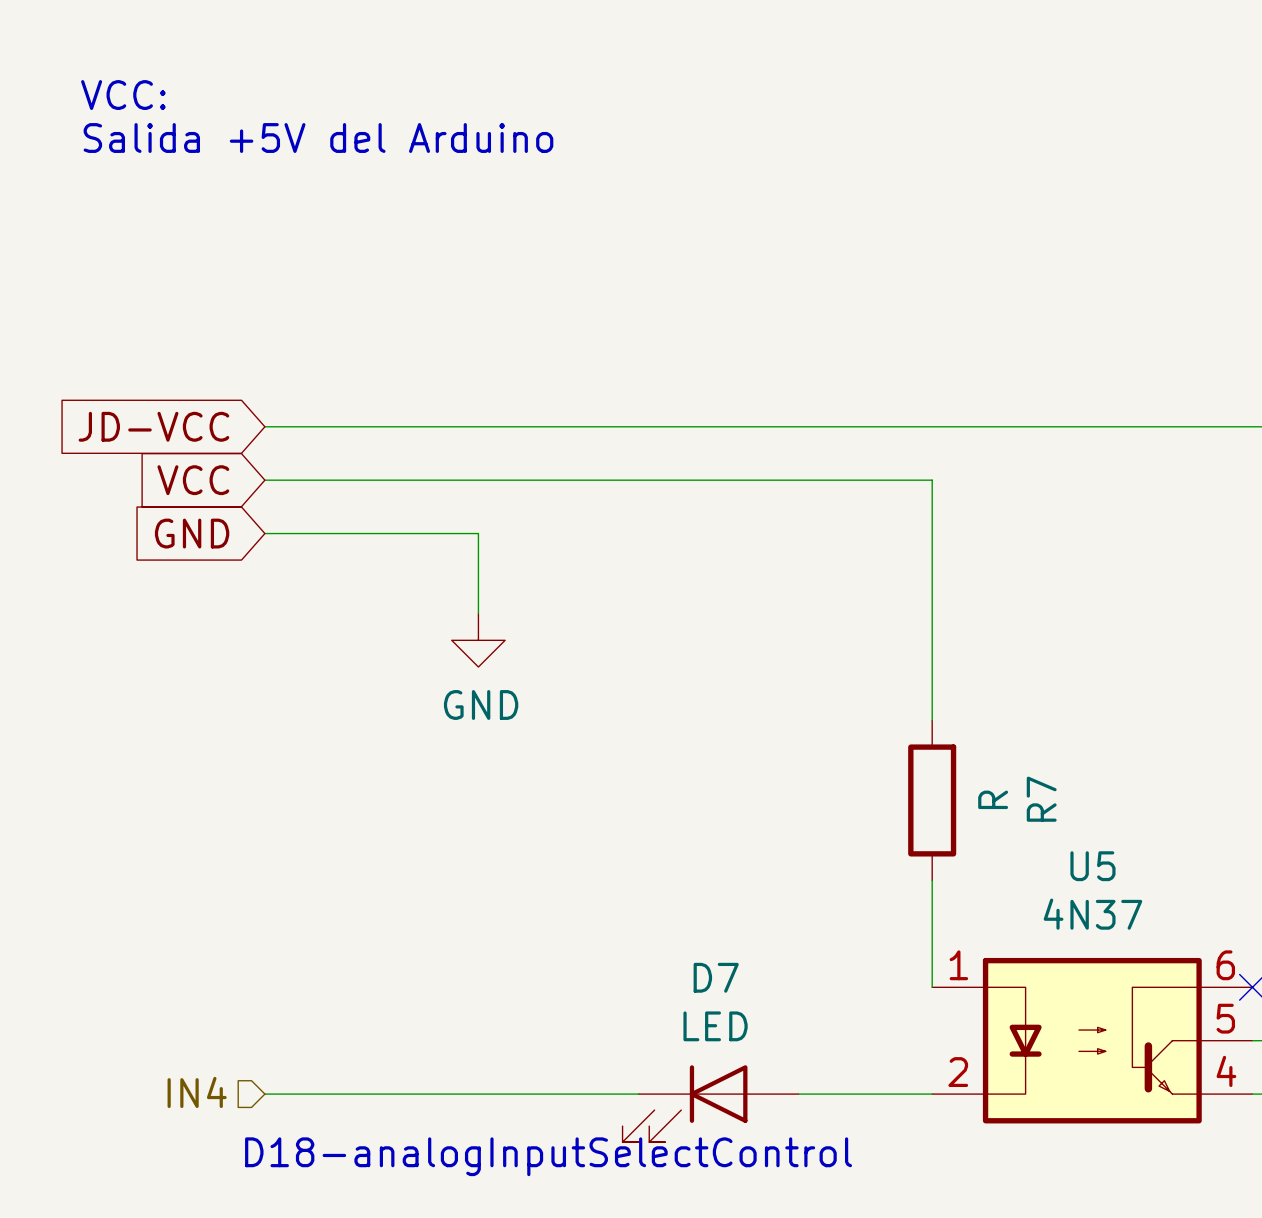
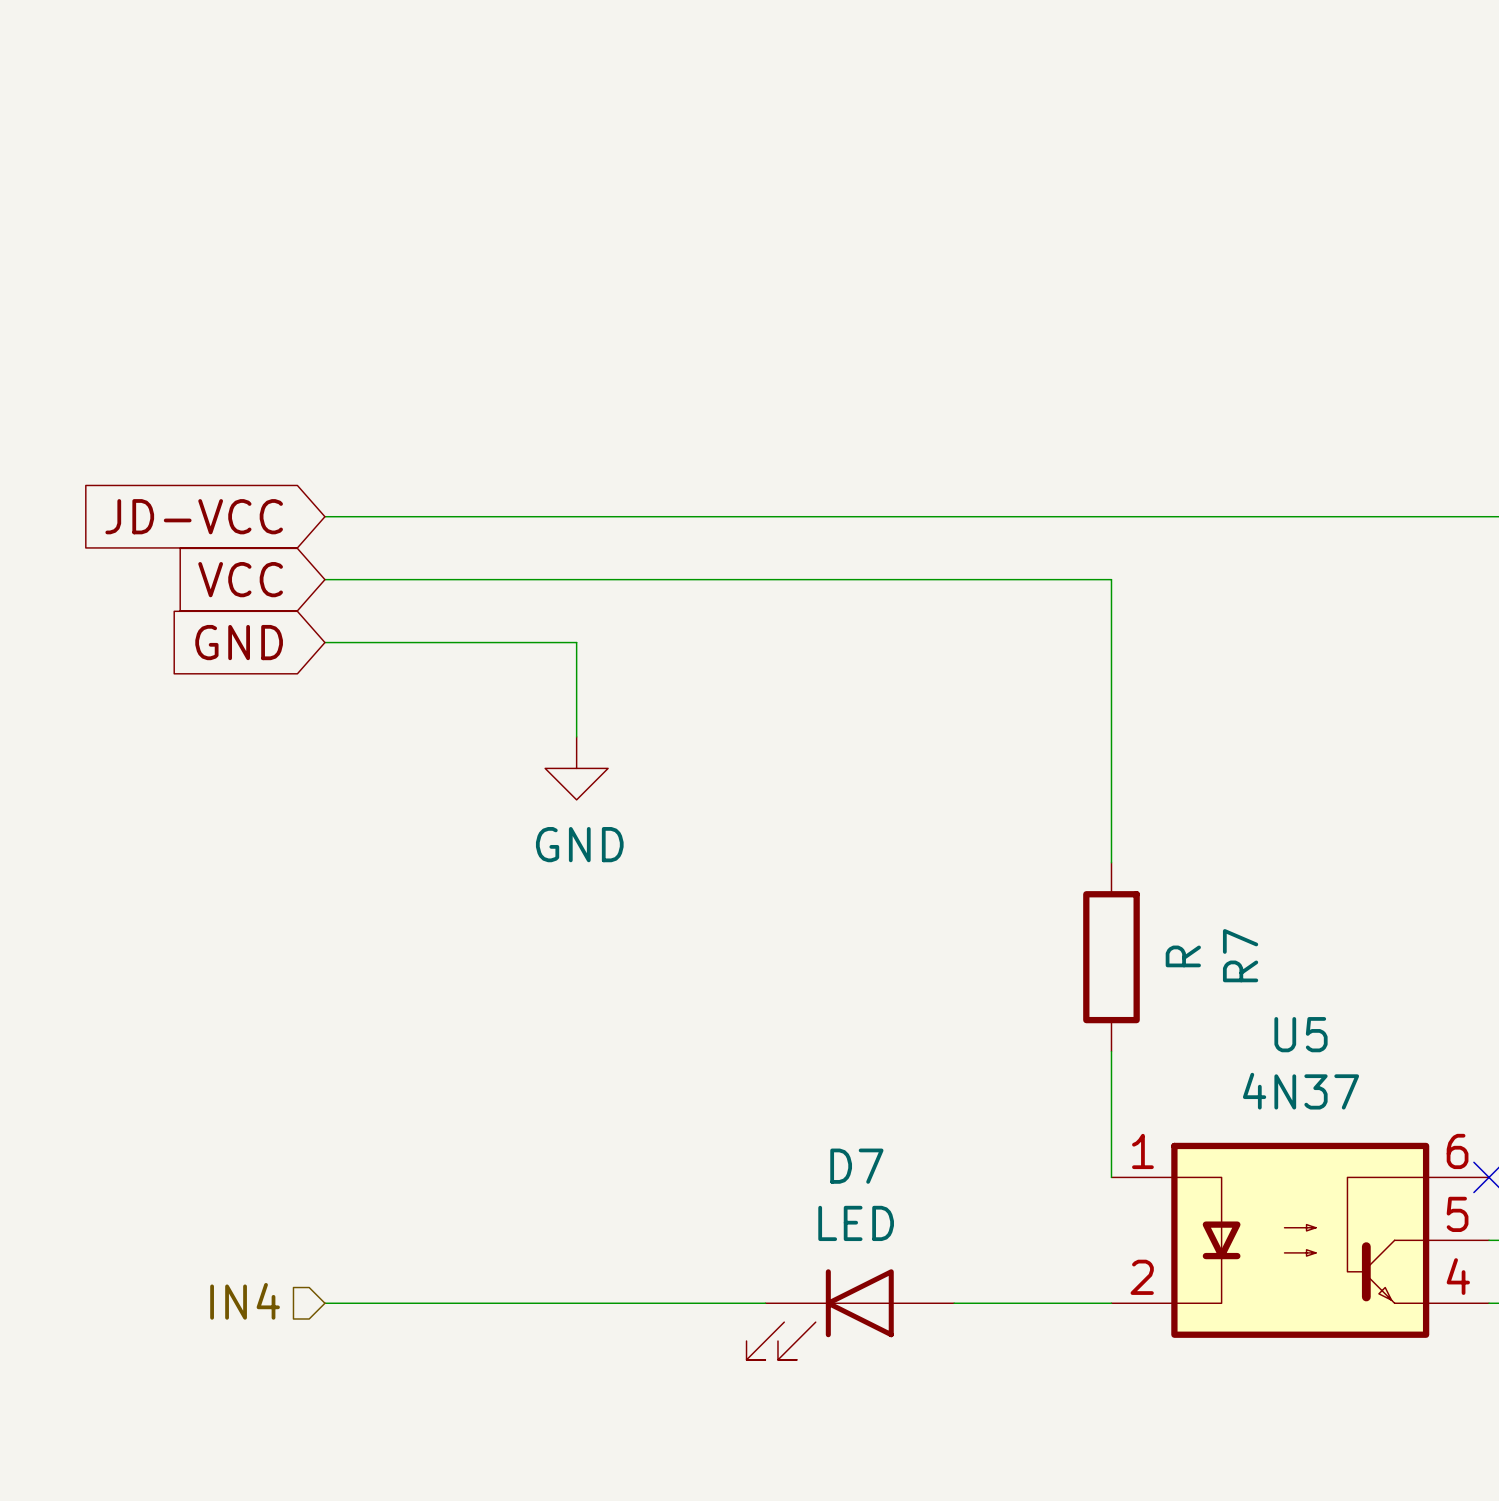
text: VCC: (123, 95) -> none
text: Salida +5V del Arduino (318, 138) -> none
text: D18-analogInputSelectControl (548, 1156) -> none

